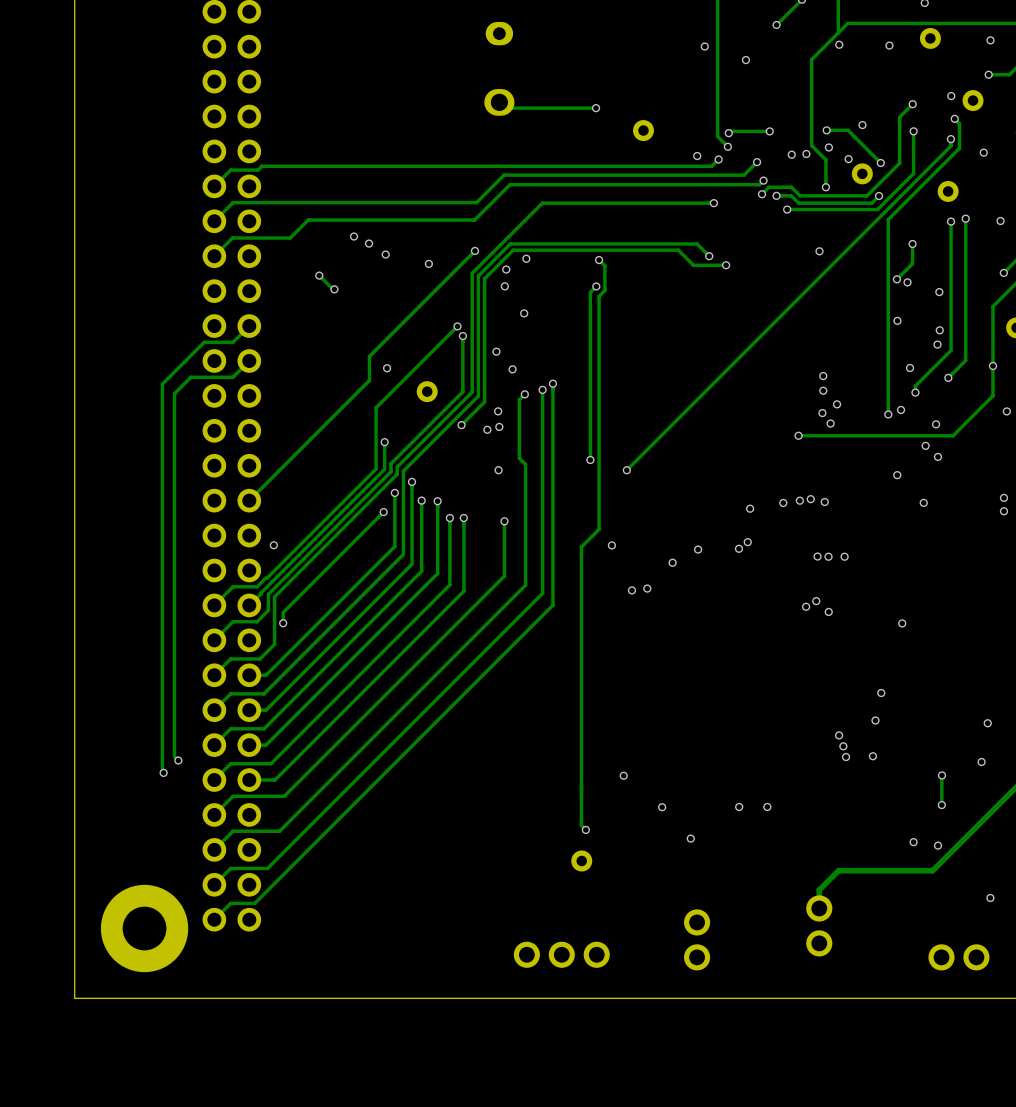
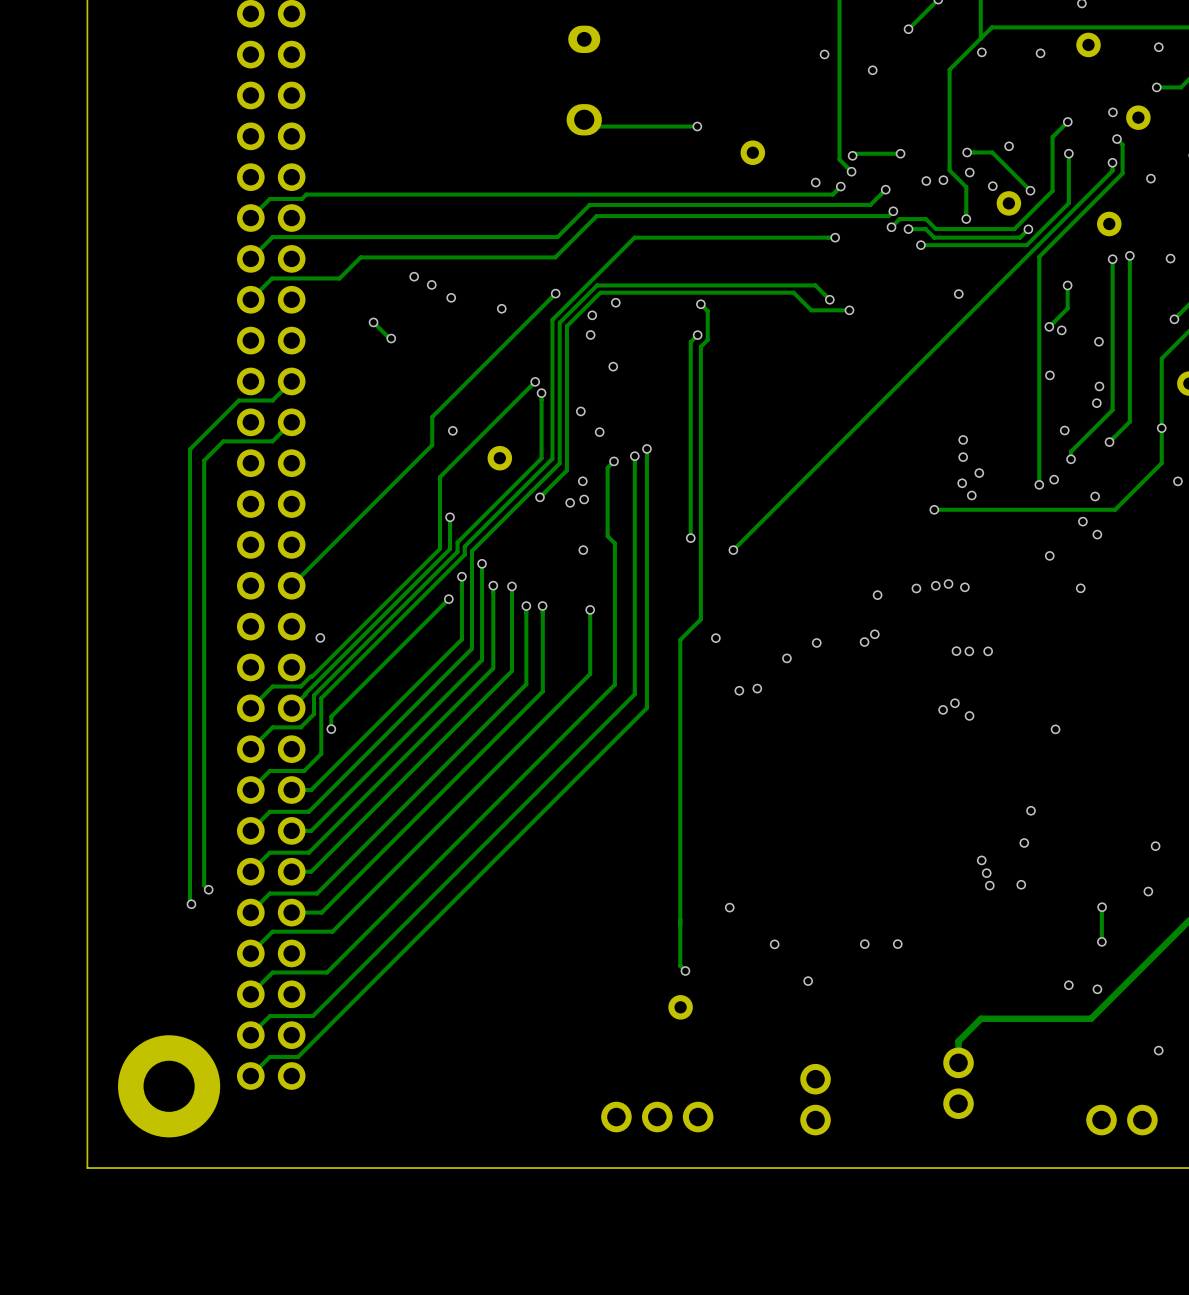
via: (1003, 497) -> none
via: (1003, 511) -> none

